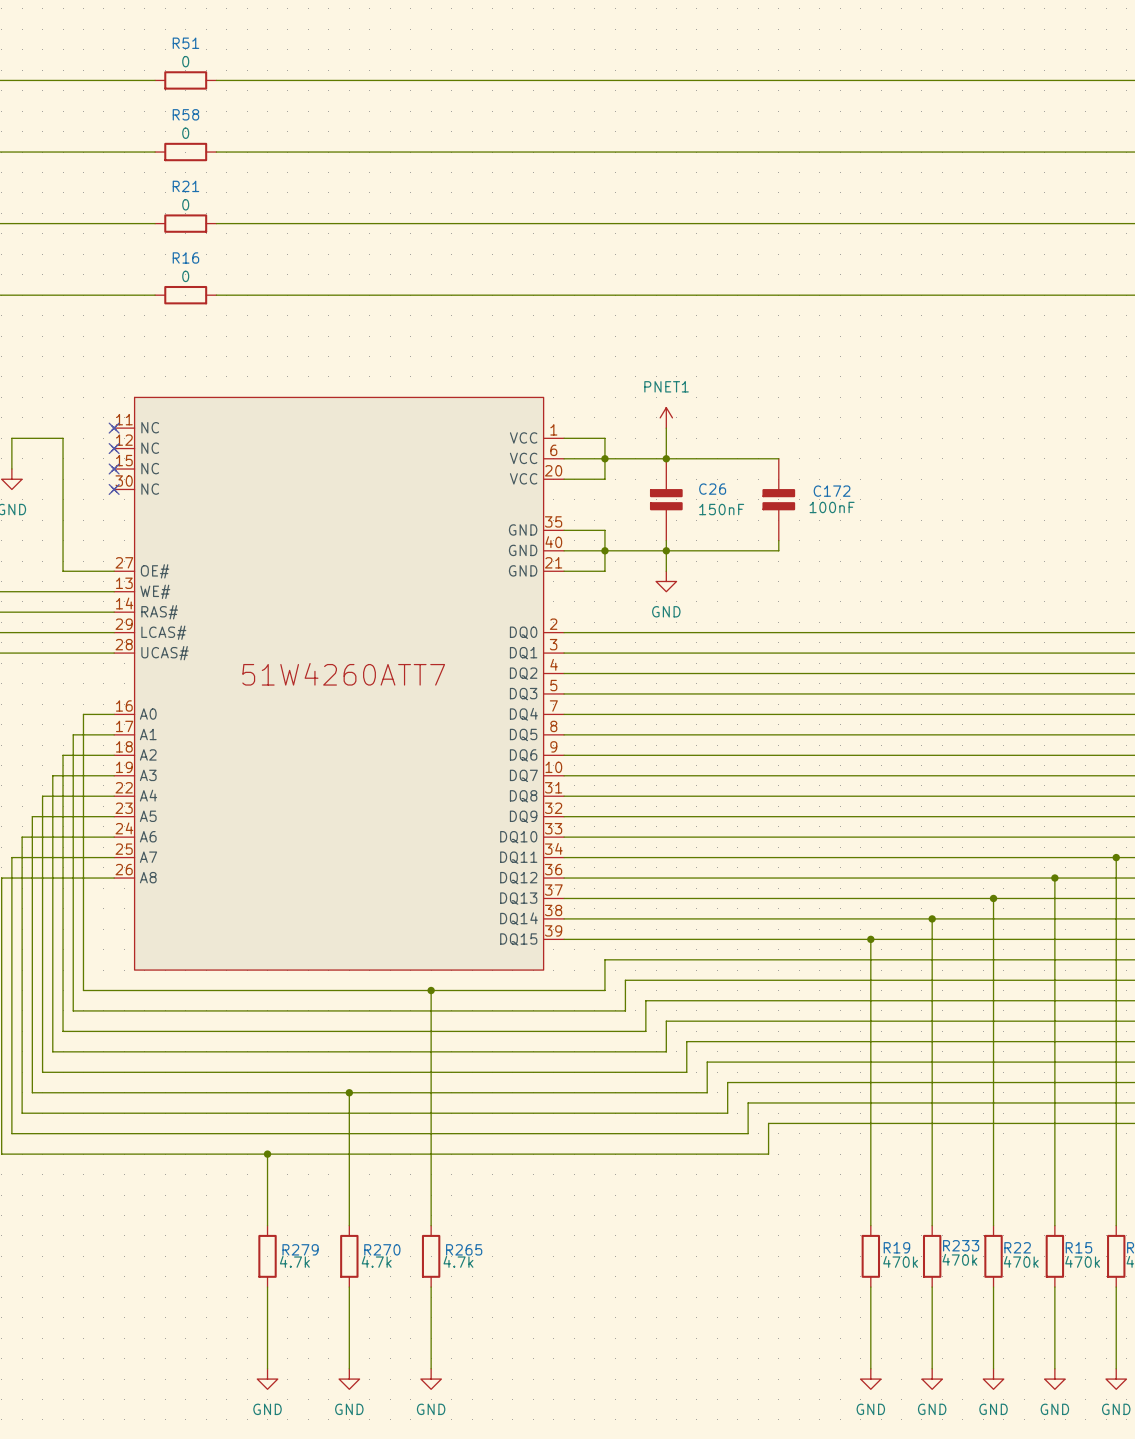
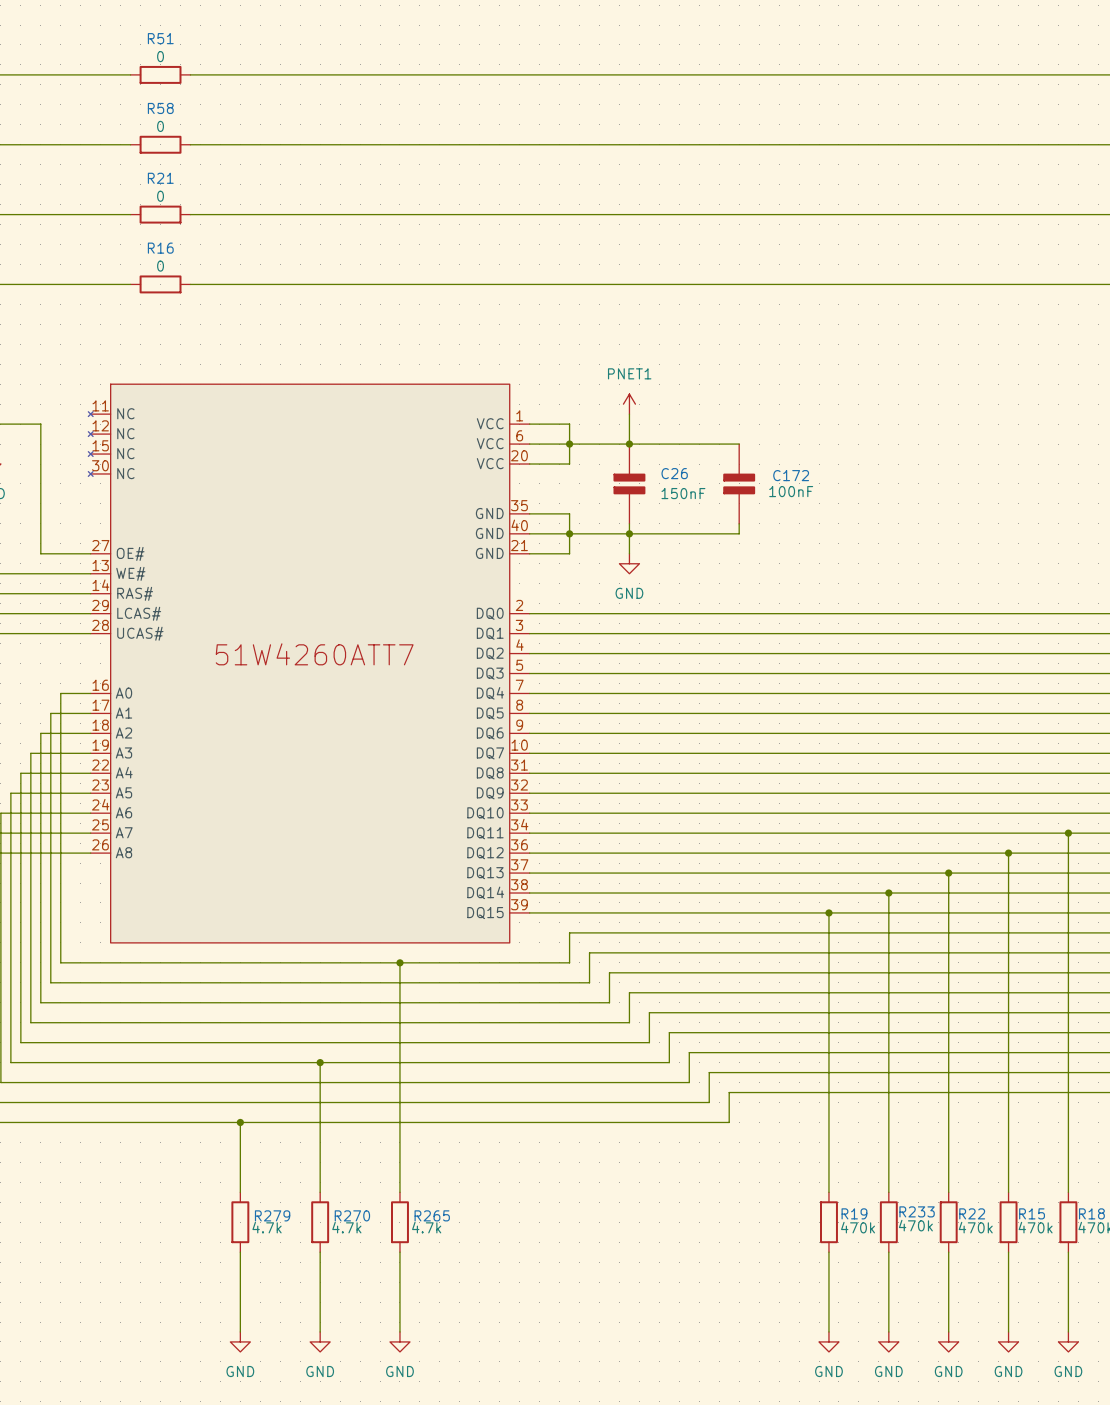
no-connect mark: (114, 428) -> none
no-connect mark: (114, 448) -> none
no-connect mark: (114, 469) -> none
no-connect mark: (114, 489) -> none

